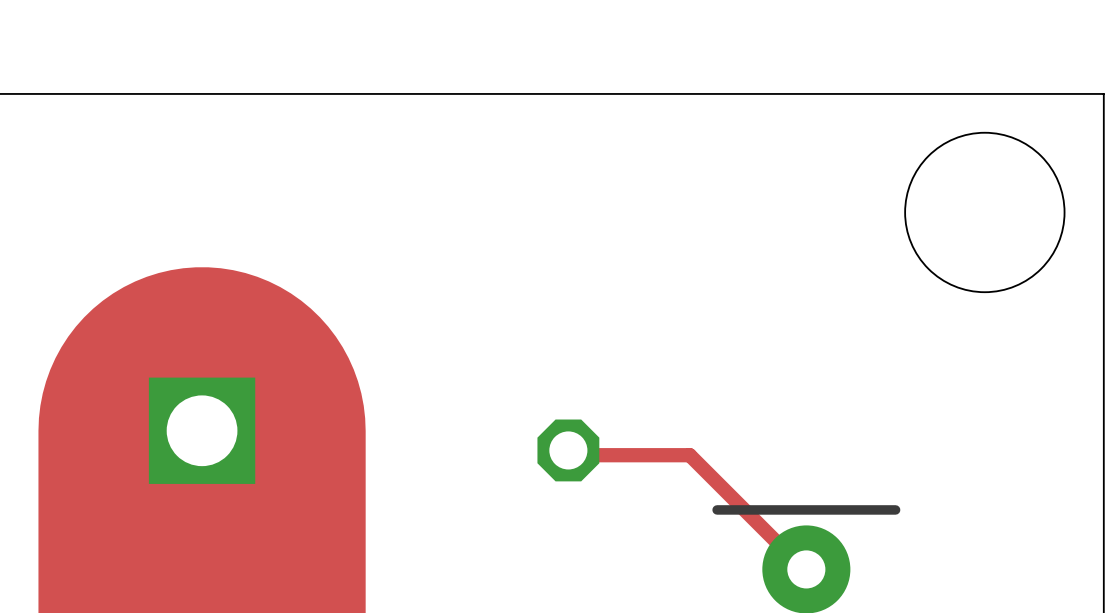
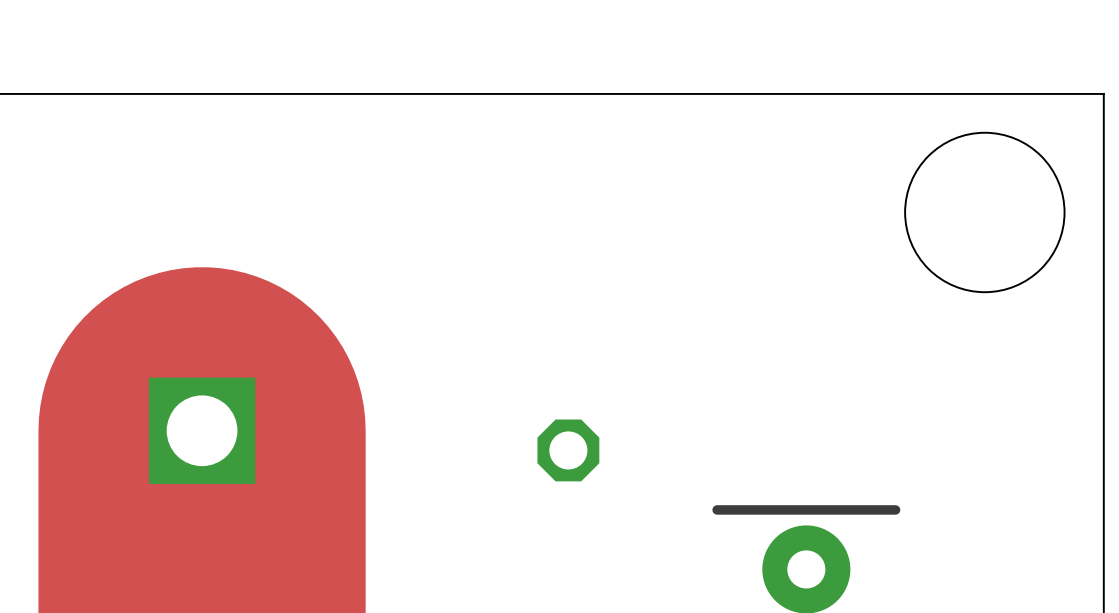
top track: (568, 450) (568, 455) (689, 455) (803, 569) (806, 569) -> none

